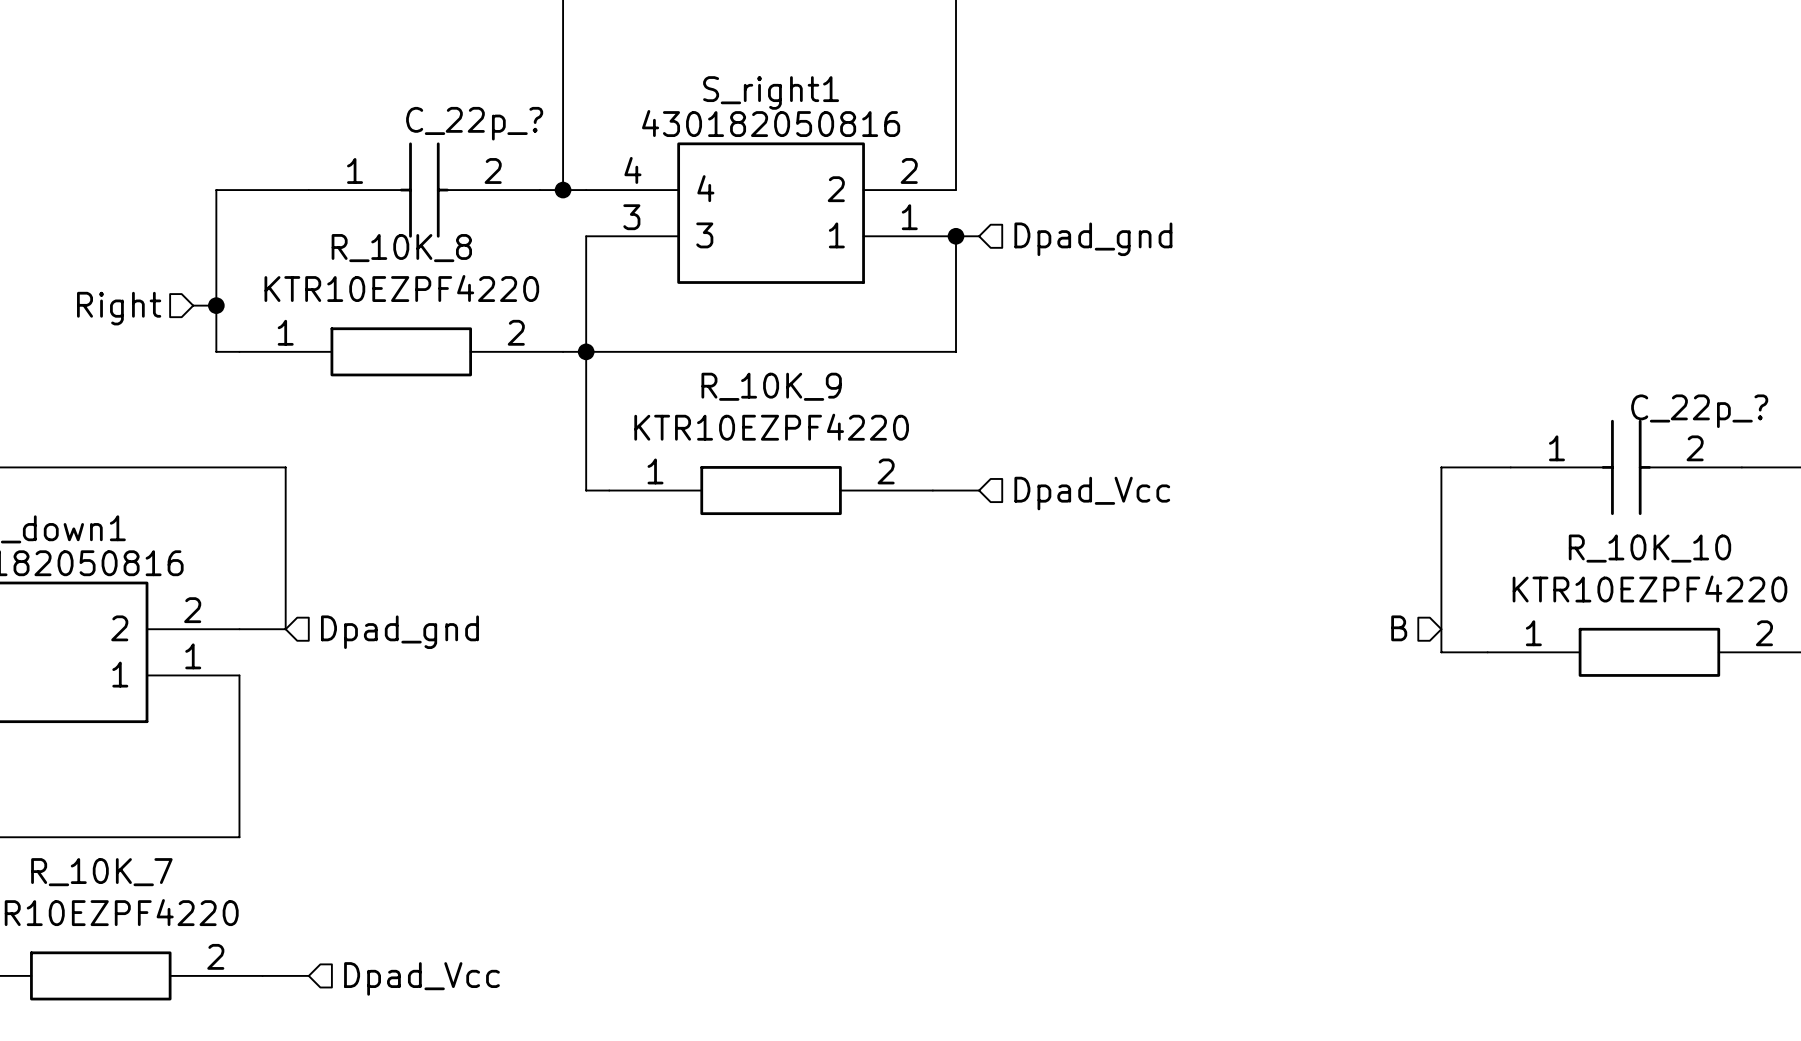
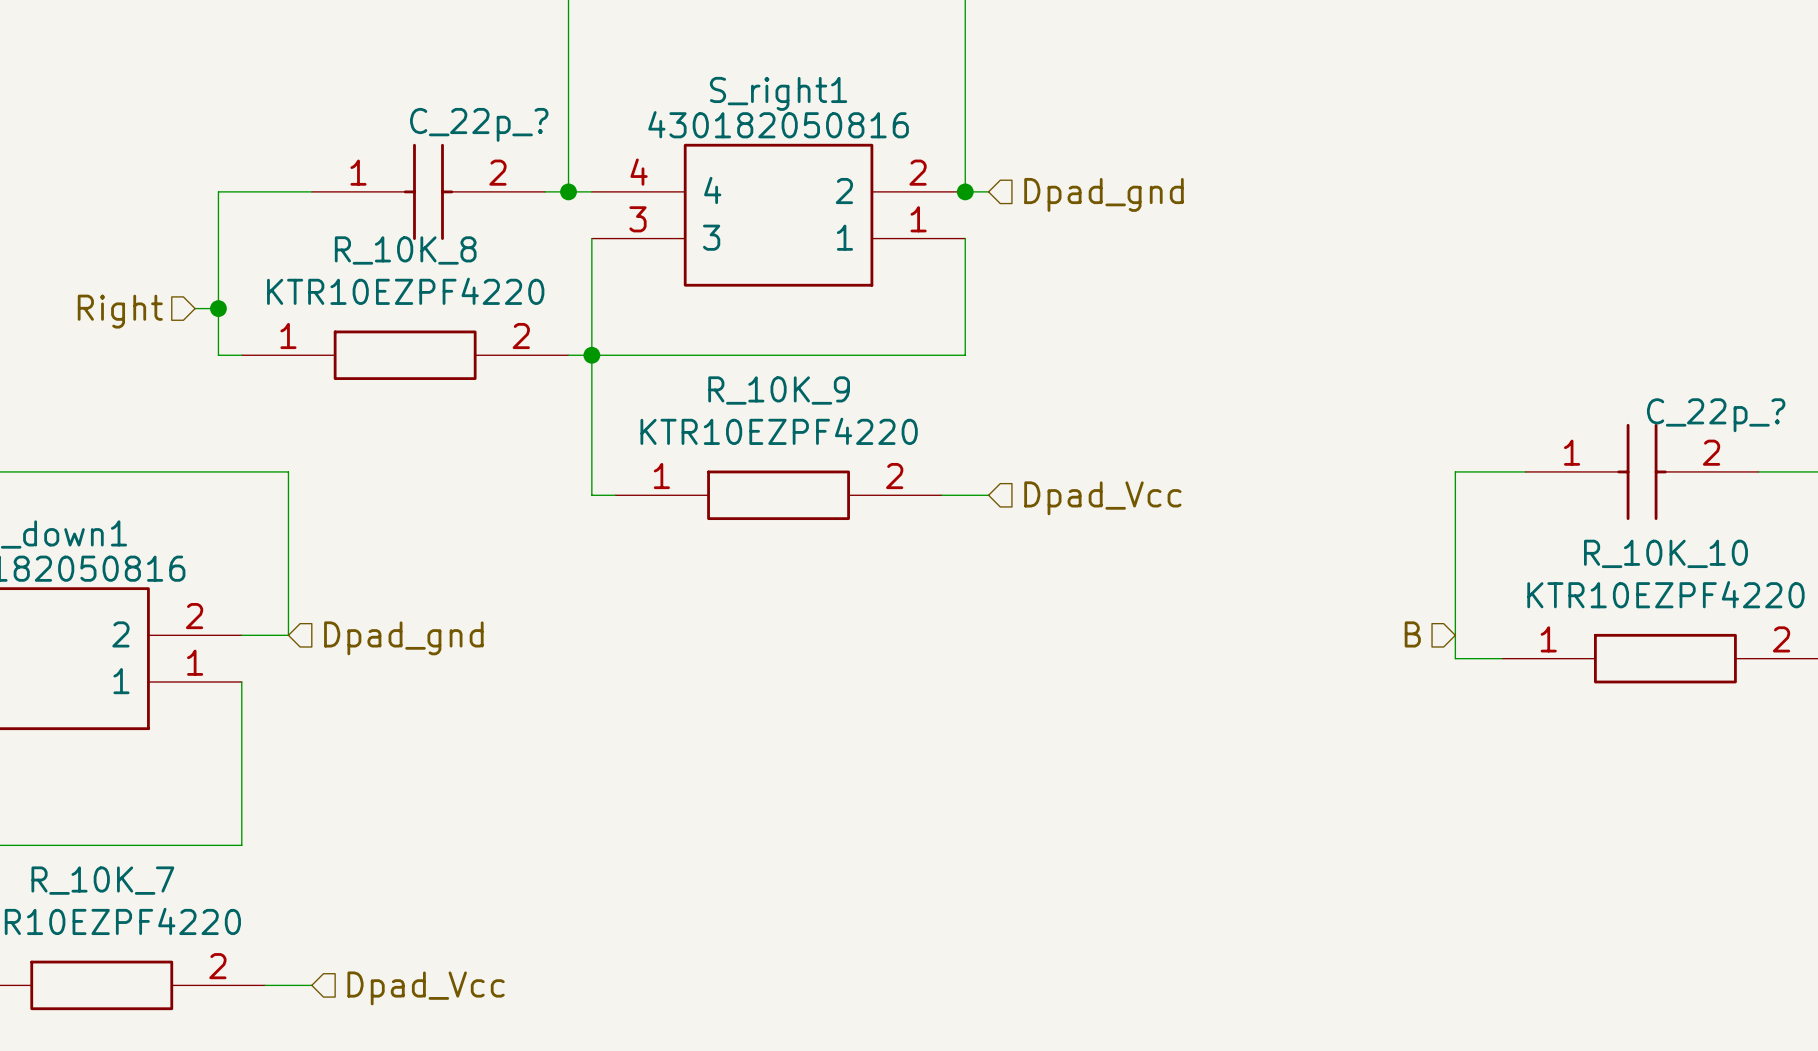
wire: (956, 236) (979, 236) -> (965, 191) (988, 191)
junction position: (956, 236) -> (965, 191)
hierarchical label position: Dpad_gnd (1093, 239) -> Dpad_gnd (1103, 194)

